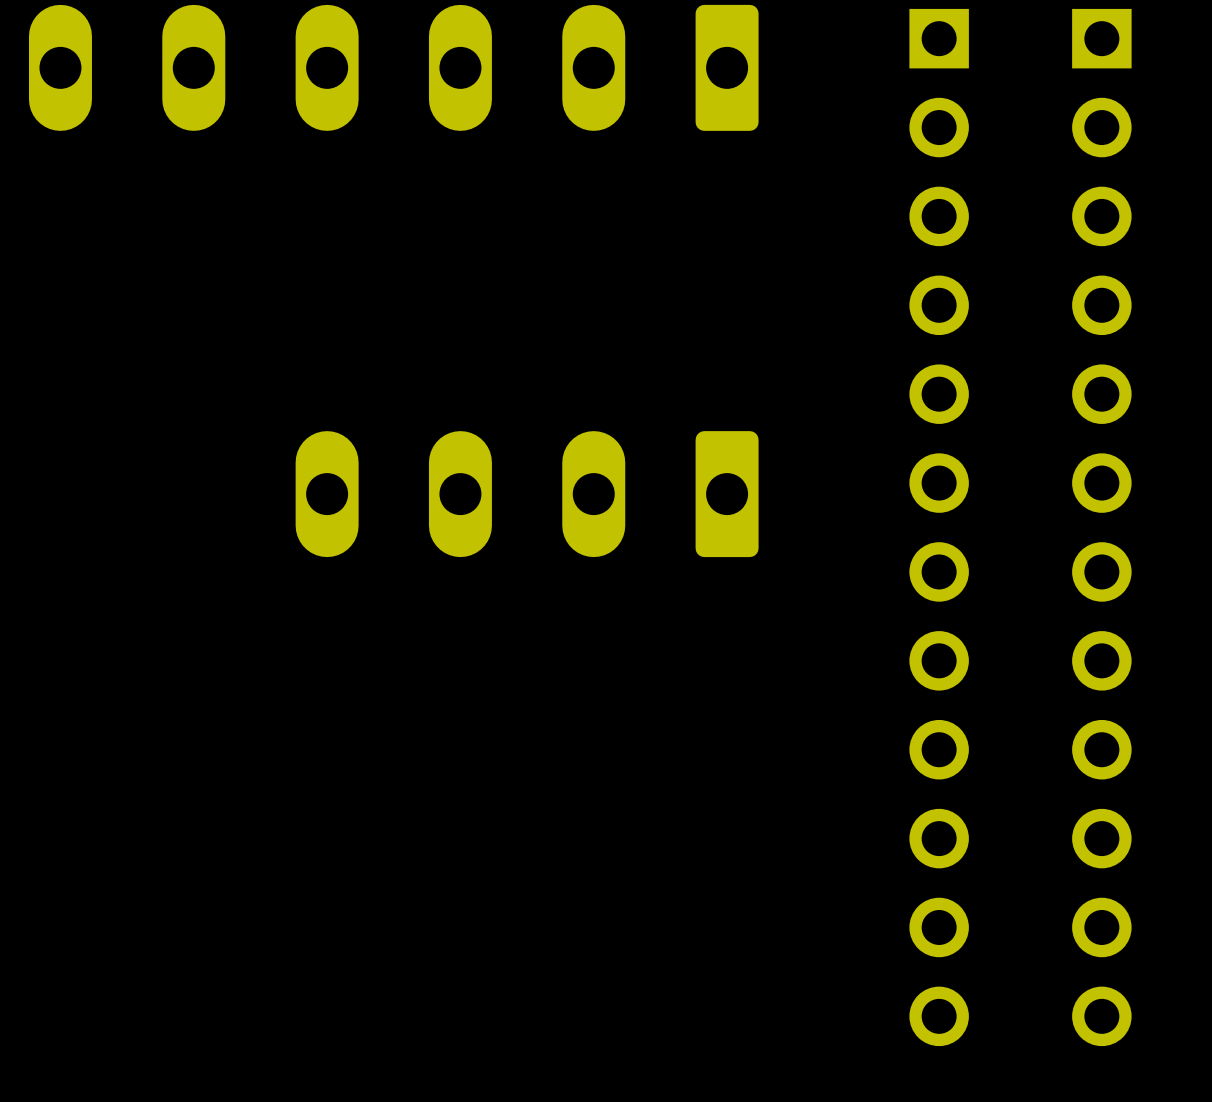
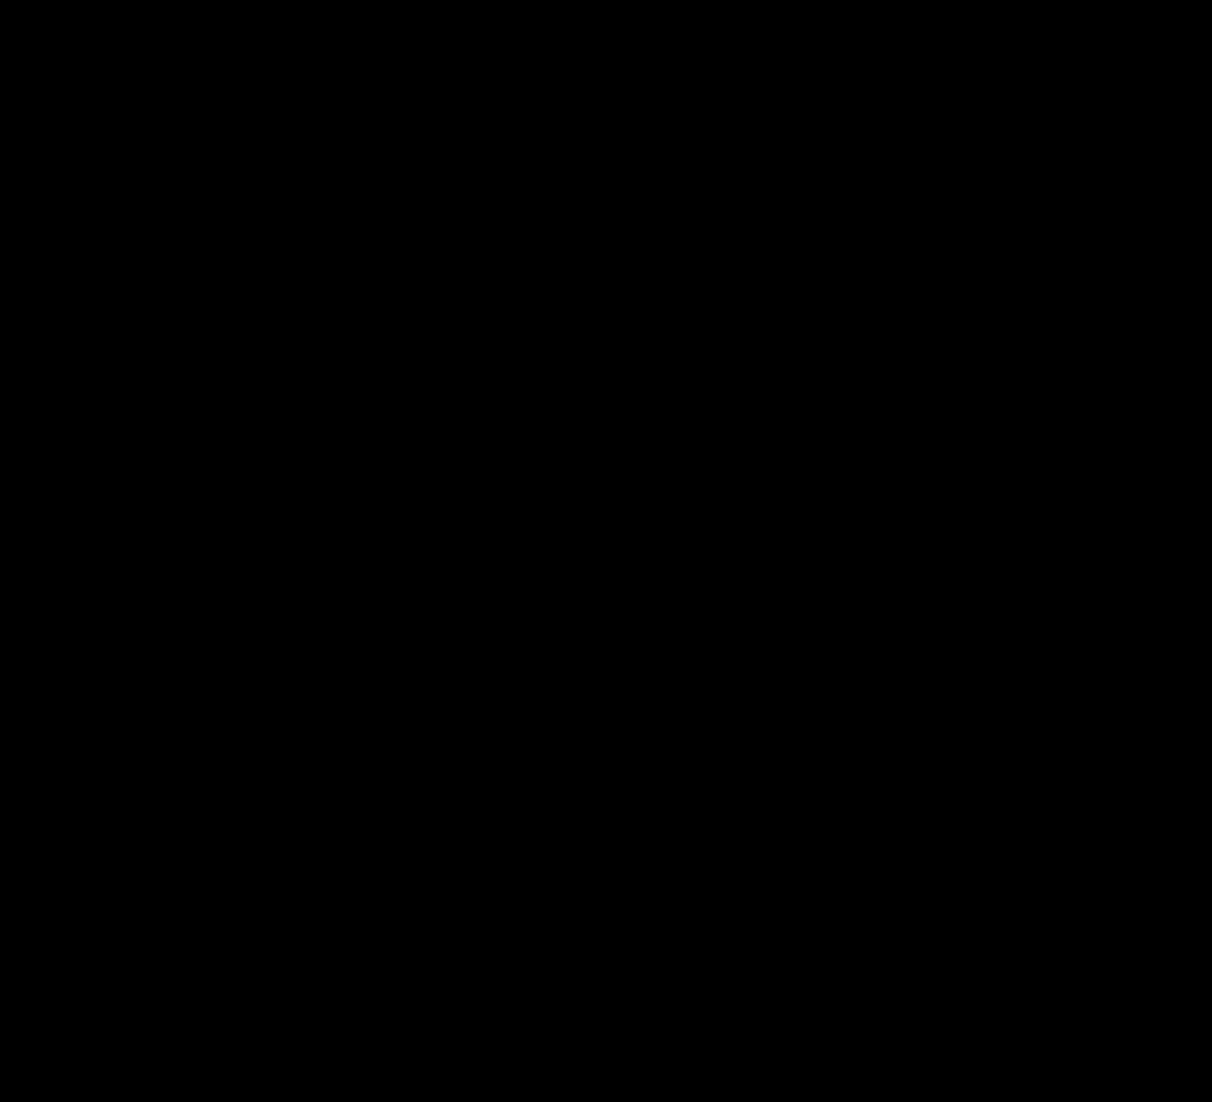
part: (393, 67) -> none
part: (527, 494) -> none
part: (939, 527) -> none
part: (1101, 527) -> none

